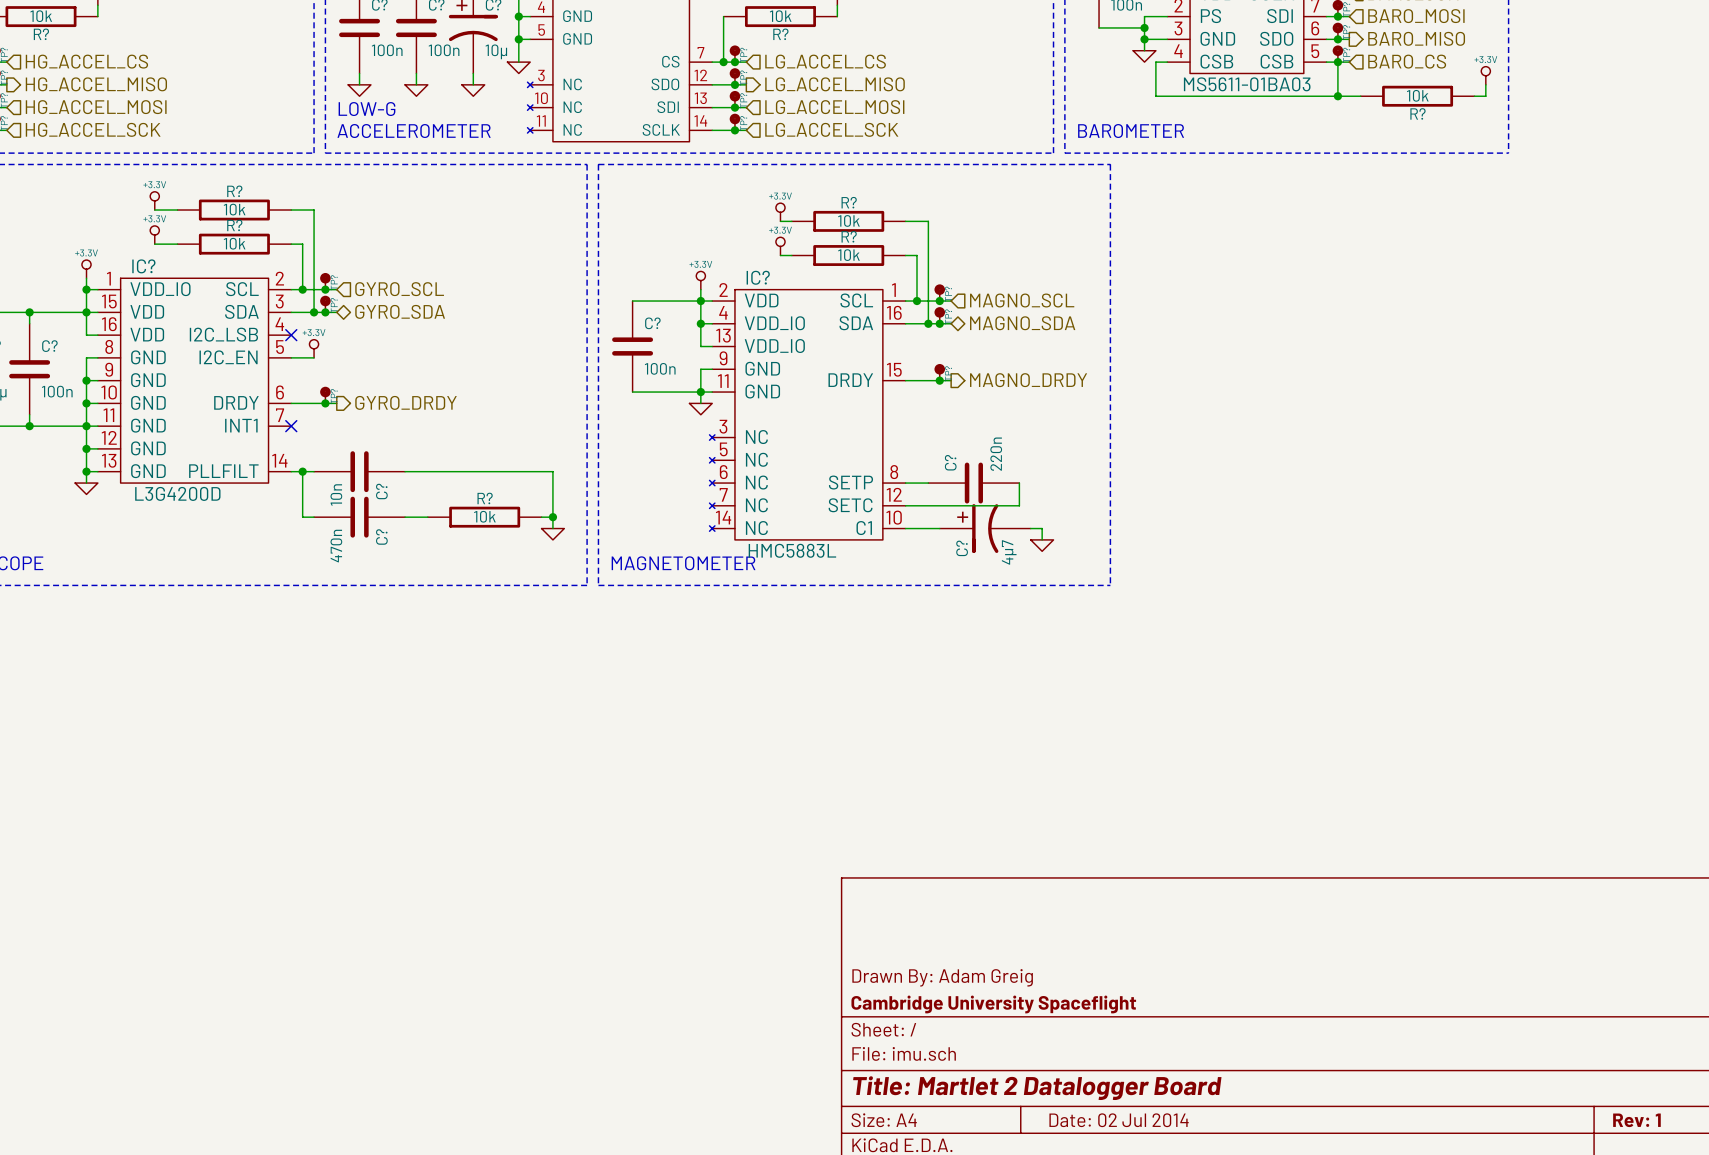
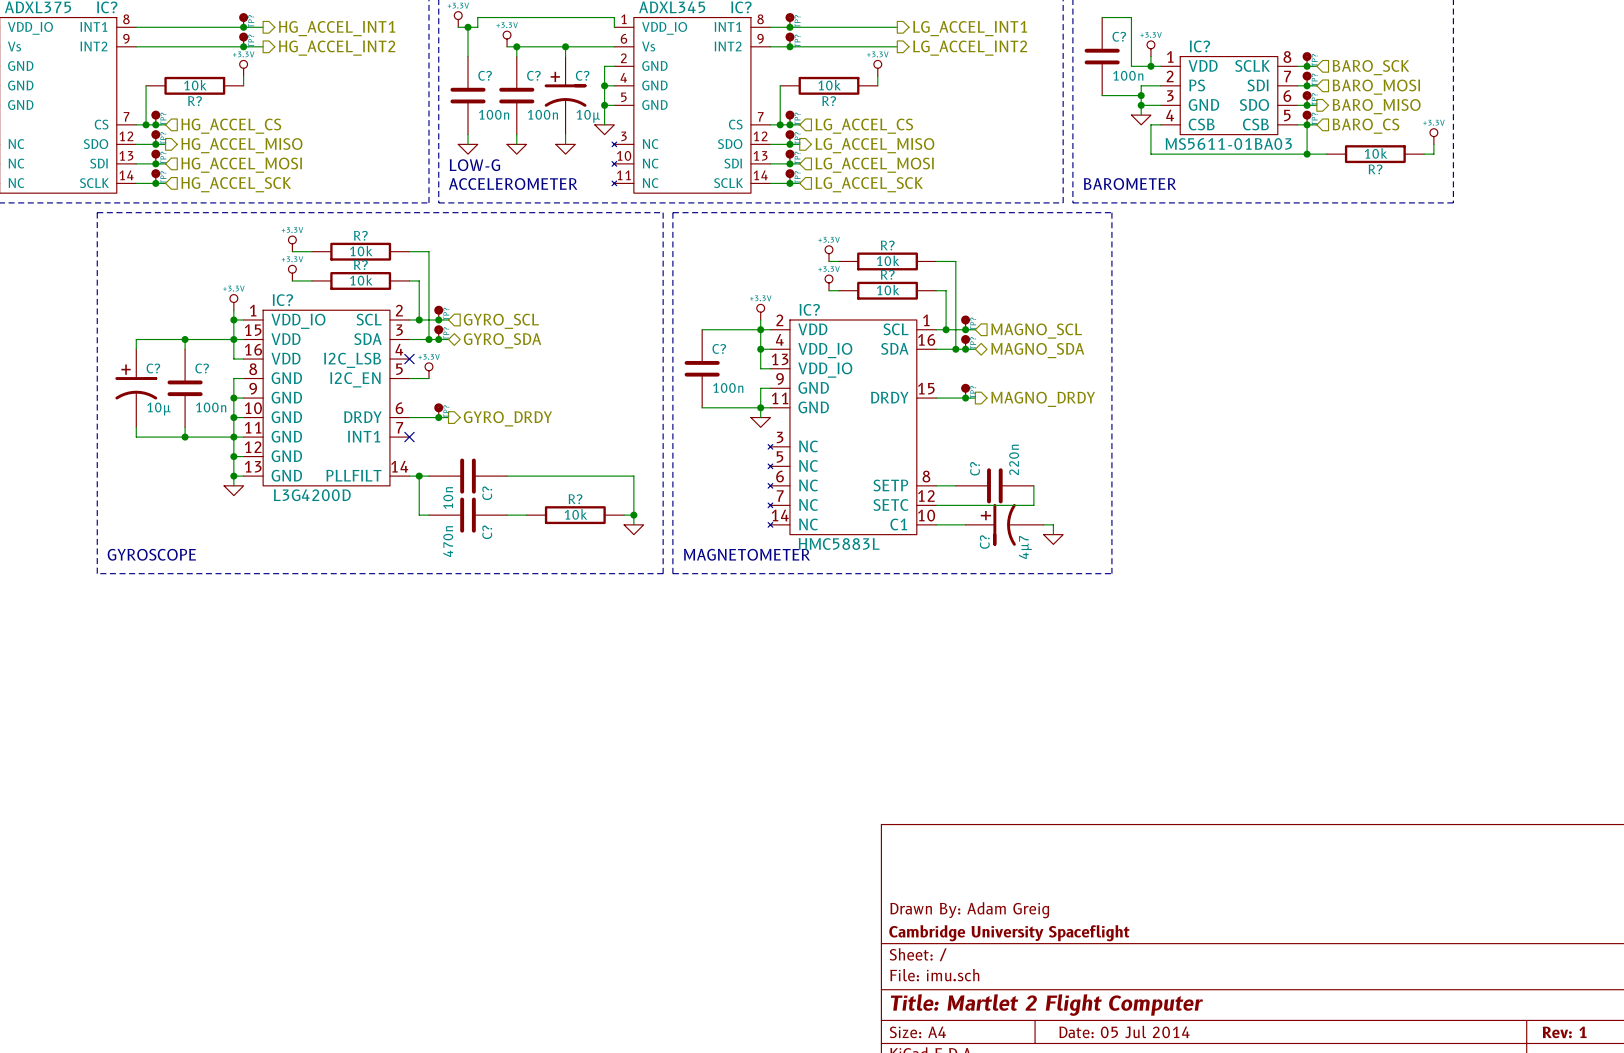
title block: Title: Martlet 2 Datalogger Board (1037, 1088) -> Title: Martlet 2 Flight Computer (1046, 1005)
title block: Date: 02 Jul 2014 (1119, 1120) -> Date: 05 Jul 2014 (1124, 1031)

